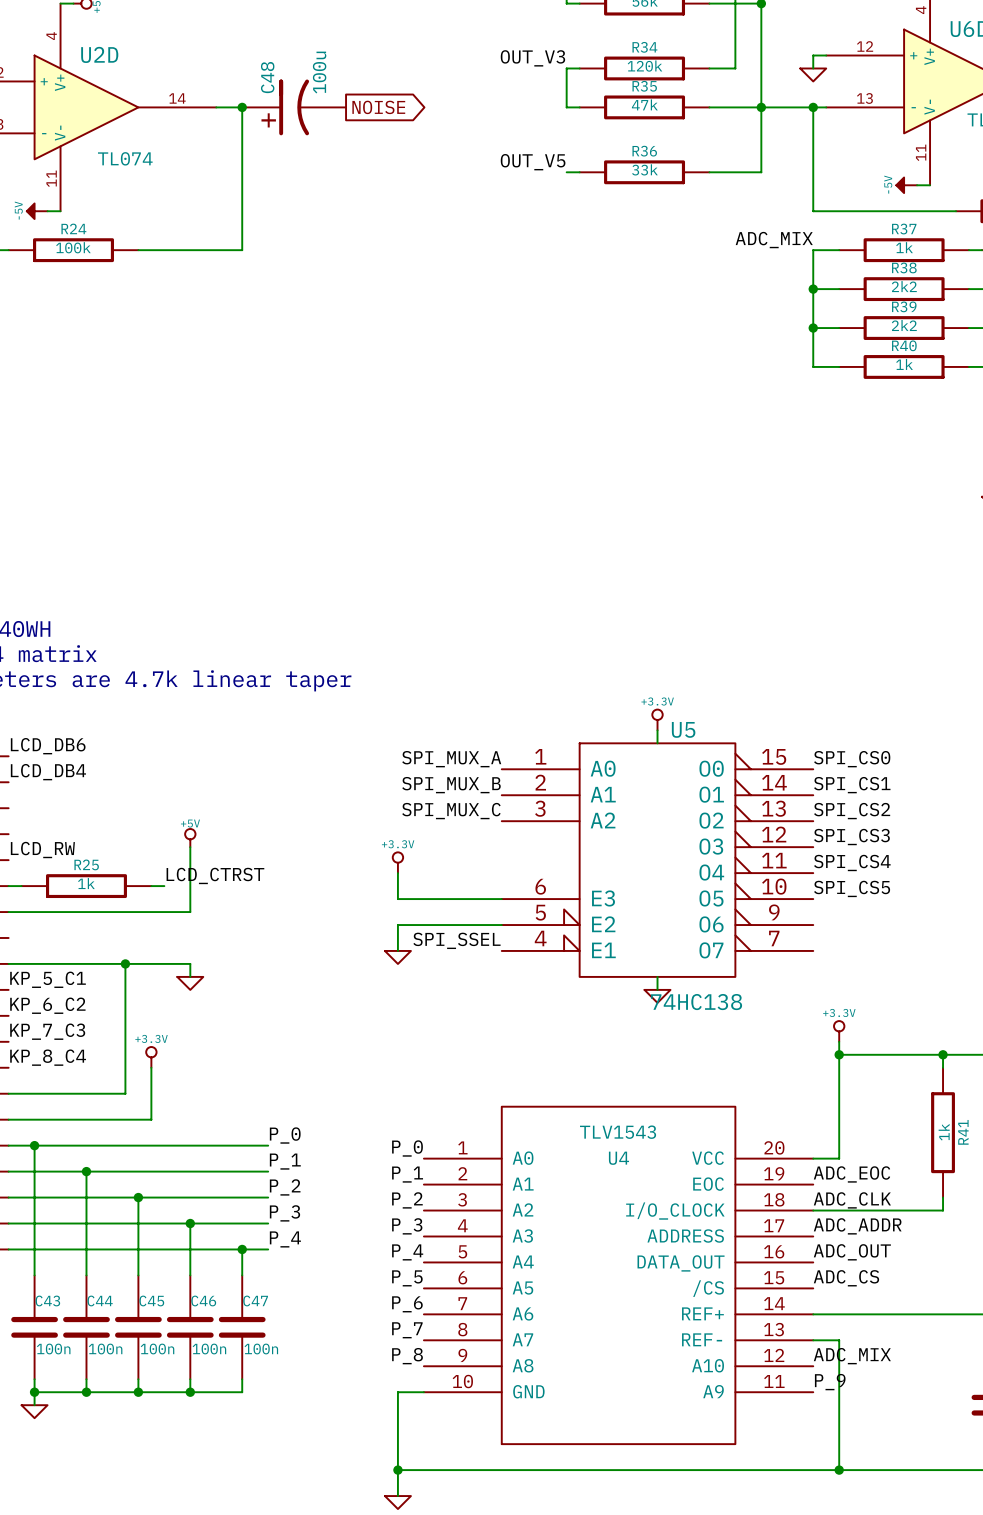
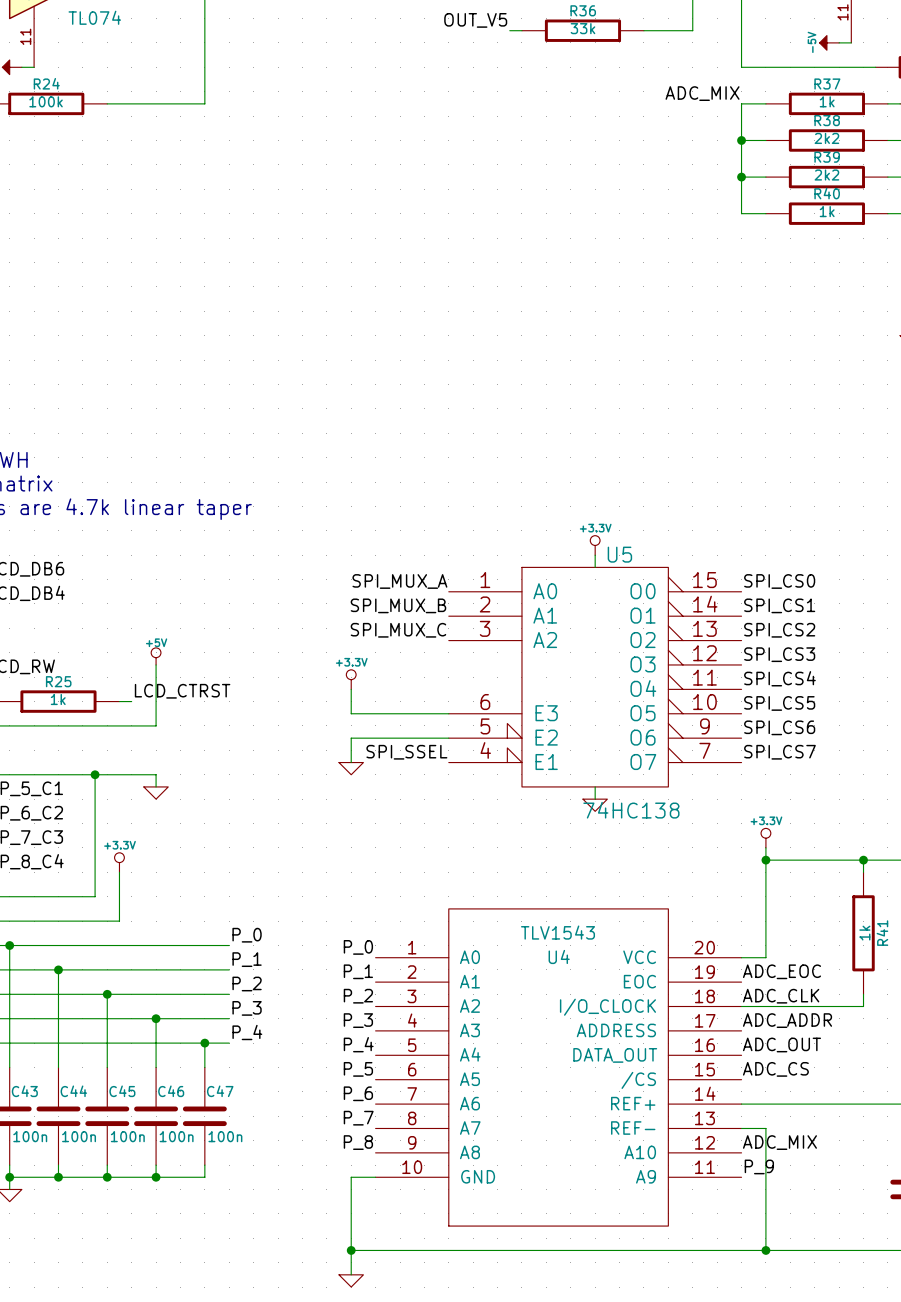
label: none -> SPI_CS6 (779, 727)
label: none -> SPI_CS7 (779, 752)

